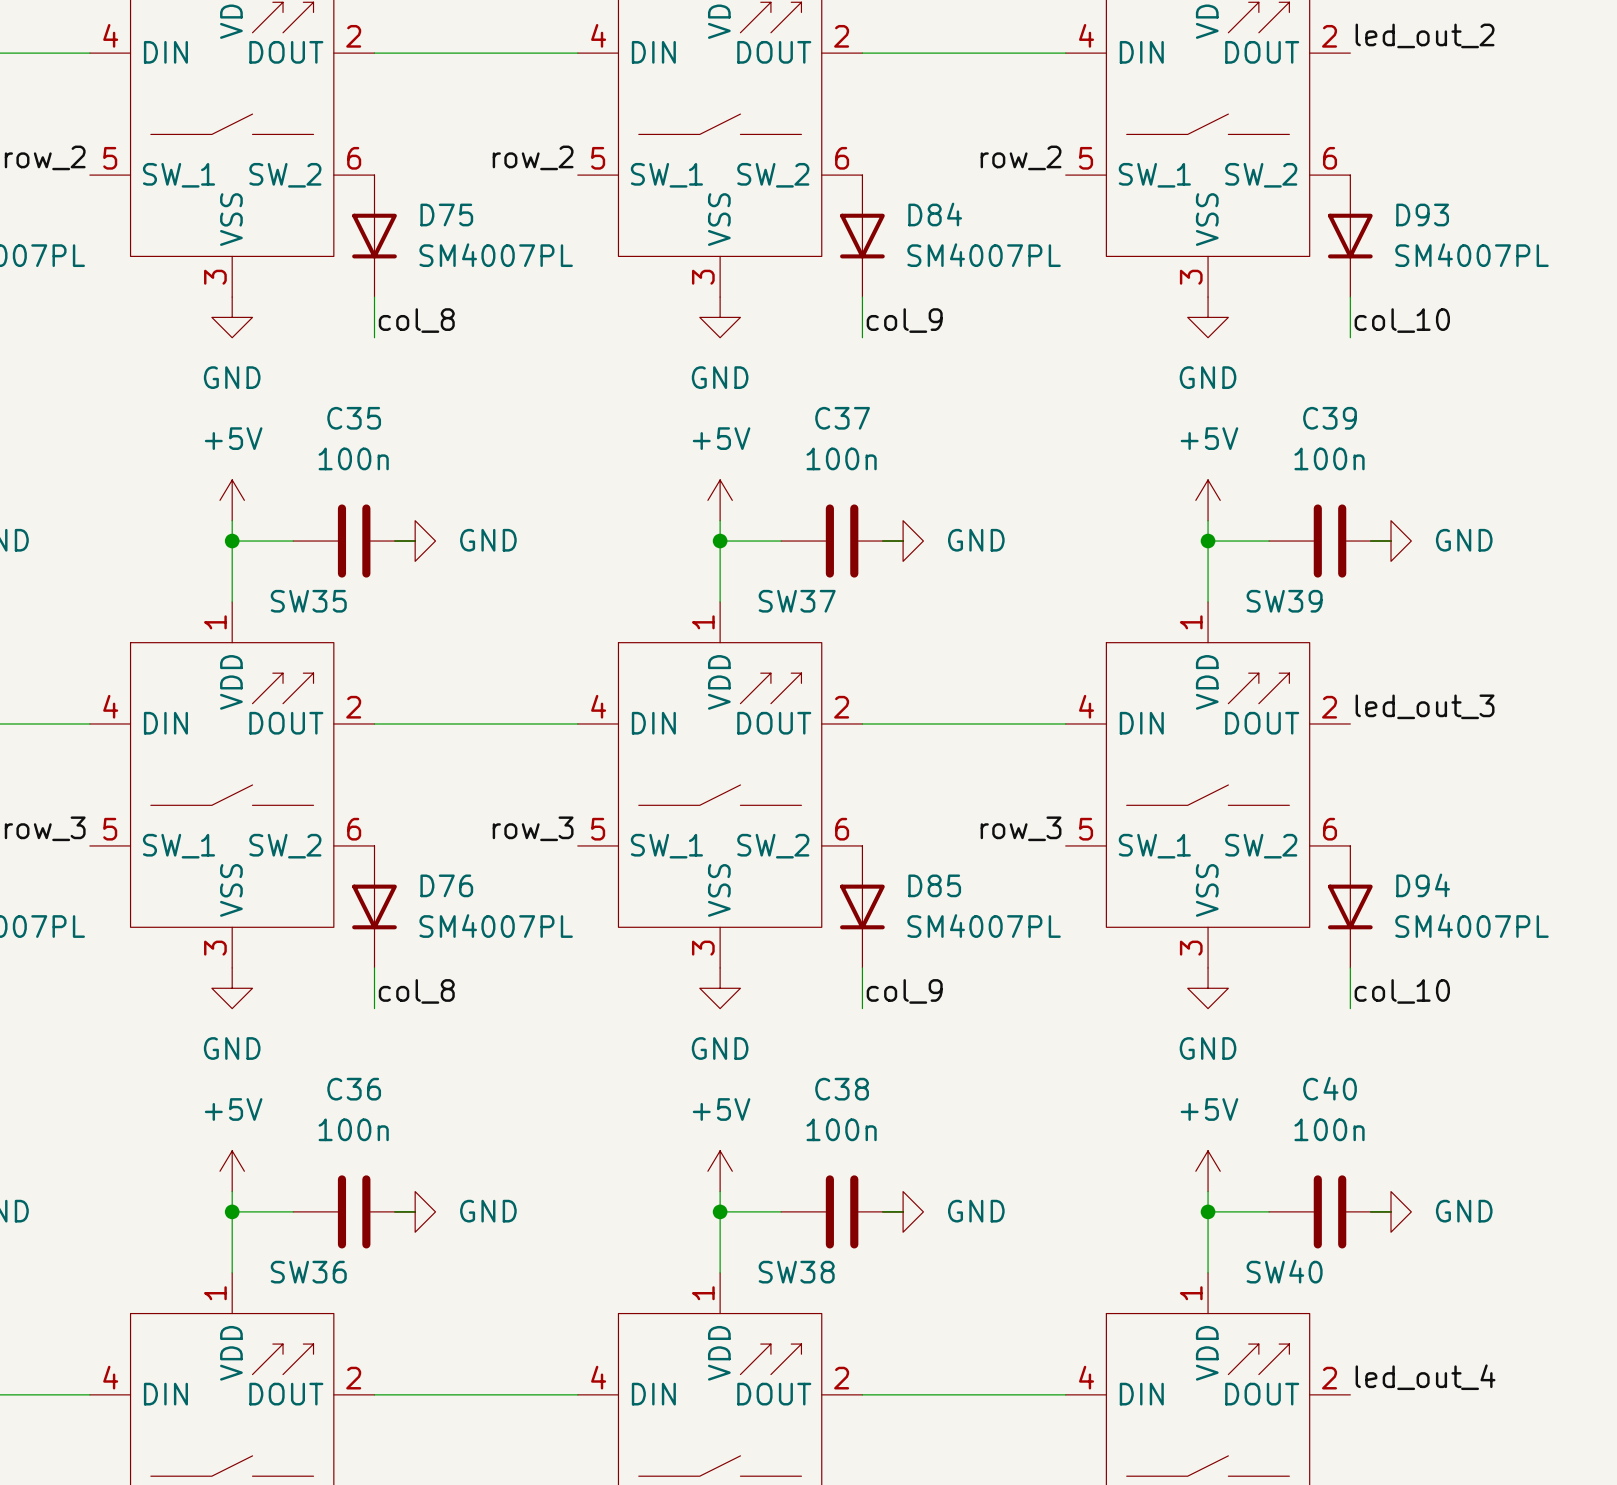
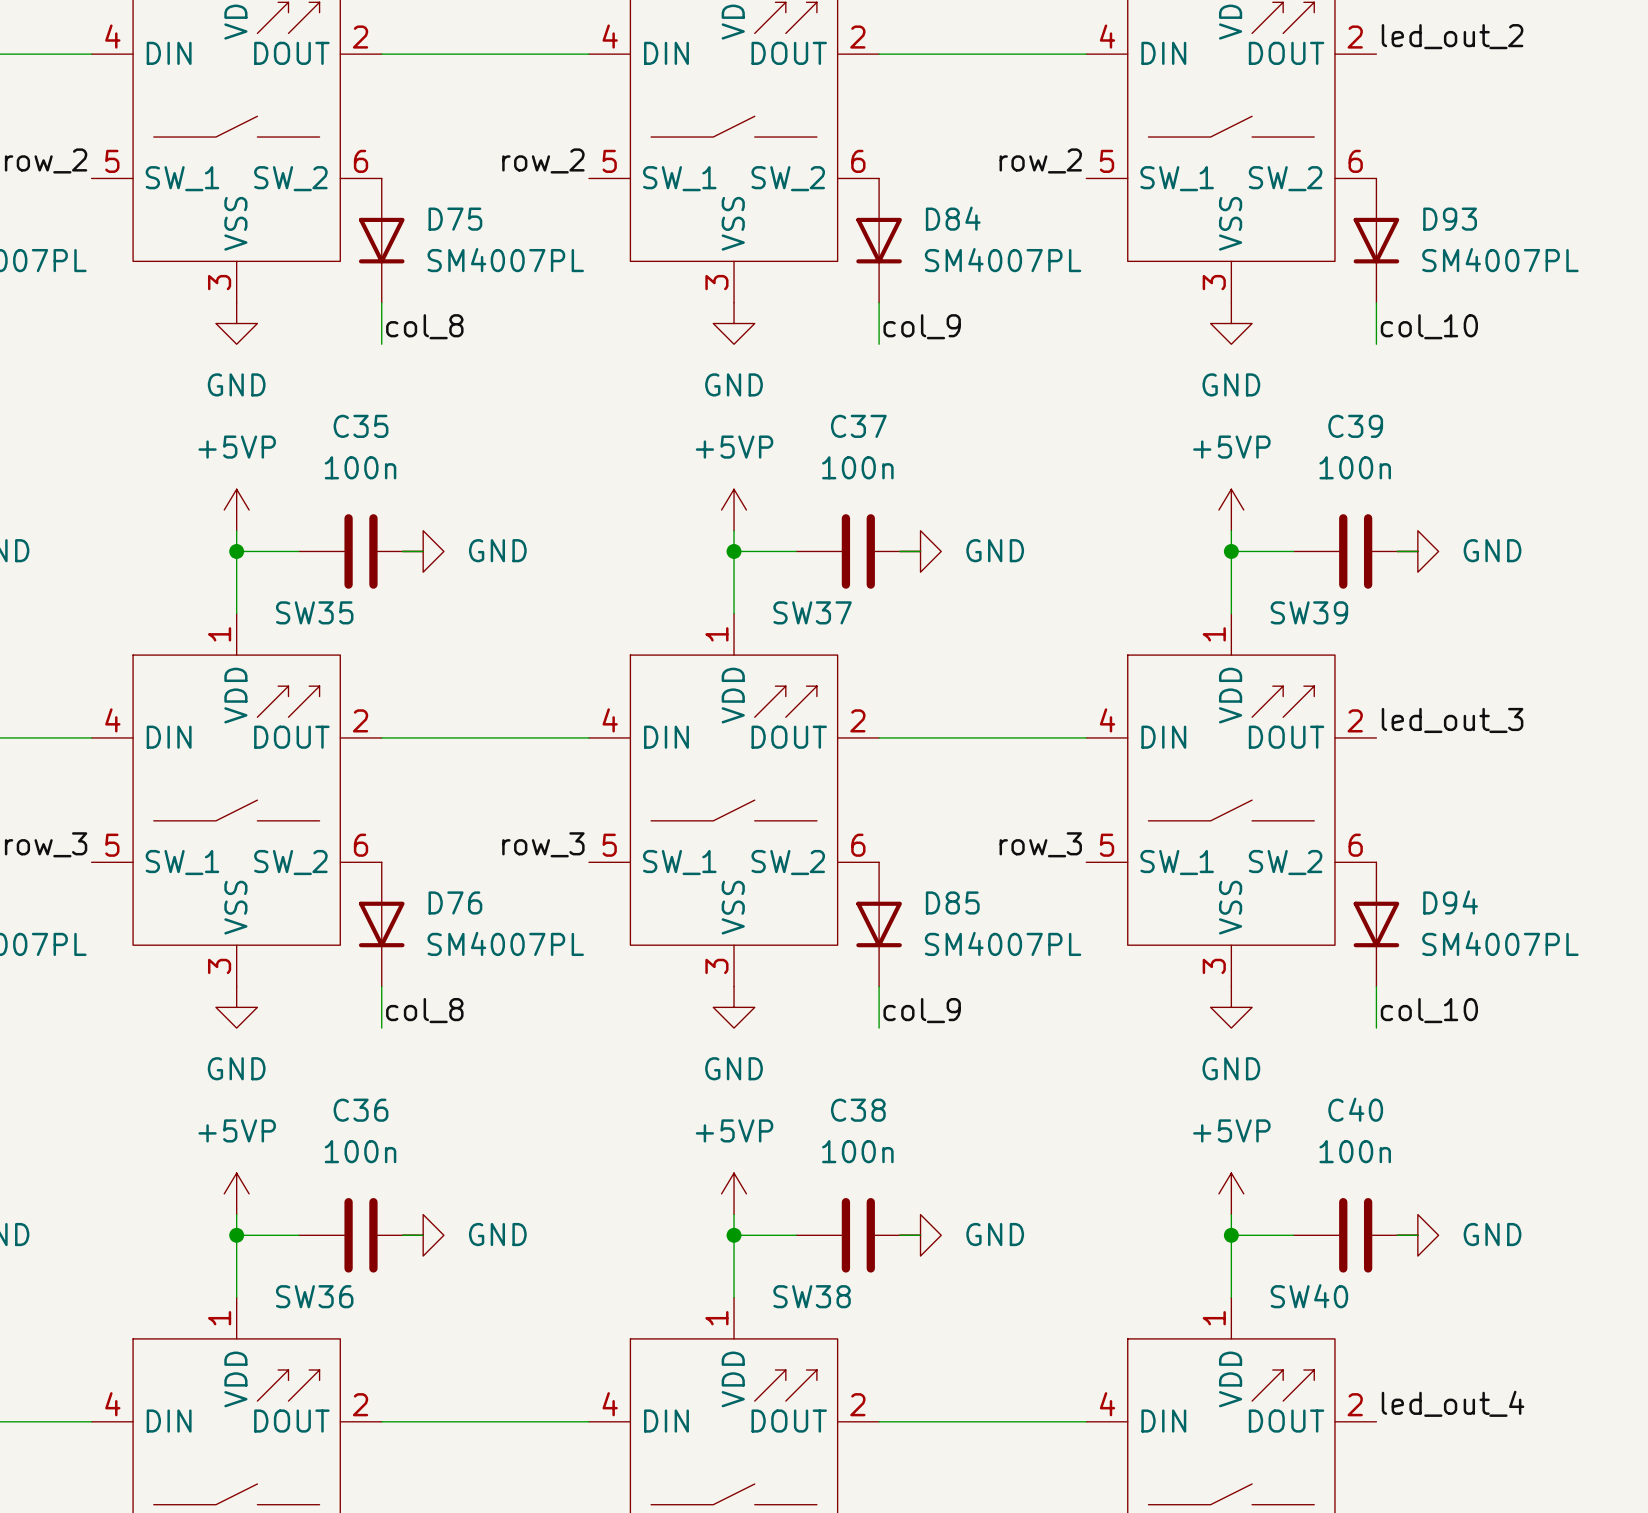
power symbol: +5V (232, 500) -> +5VP (236, 510)
power symbol: +5V (720, 500) -> +5VP (734, 510)
power symbol: +5V (1208, 500) -> +5VP (1231, 510)
power symbol: +5V (232, 1171) -> +5VP (236, 1193)
power symbol: +5V (720, 1171) -> +5VP (734, 1193)
power symbol: +5V (1208, 1171) -> +5VP (1231, 1193)

